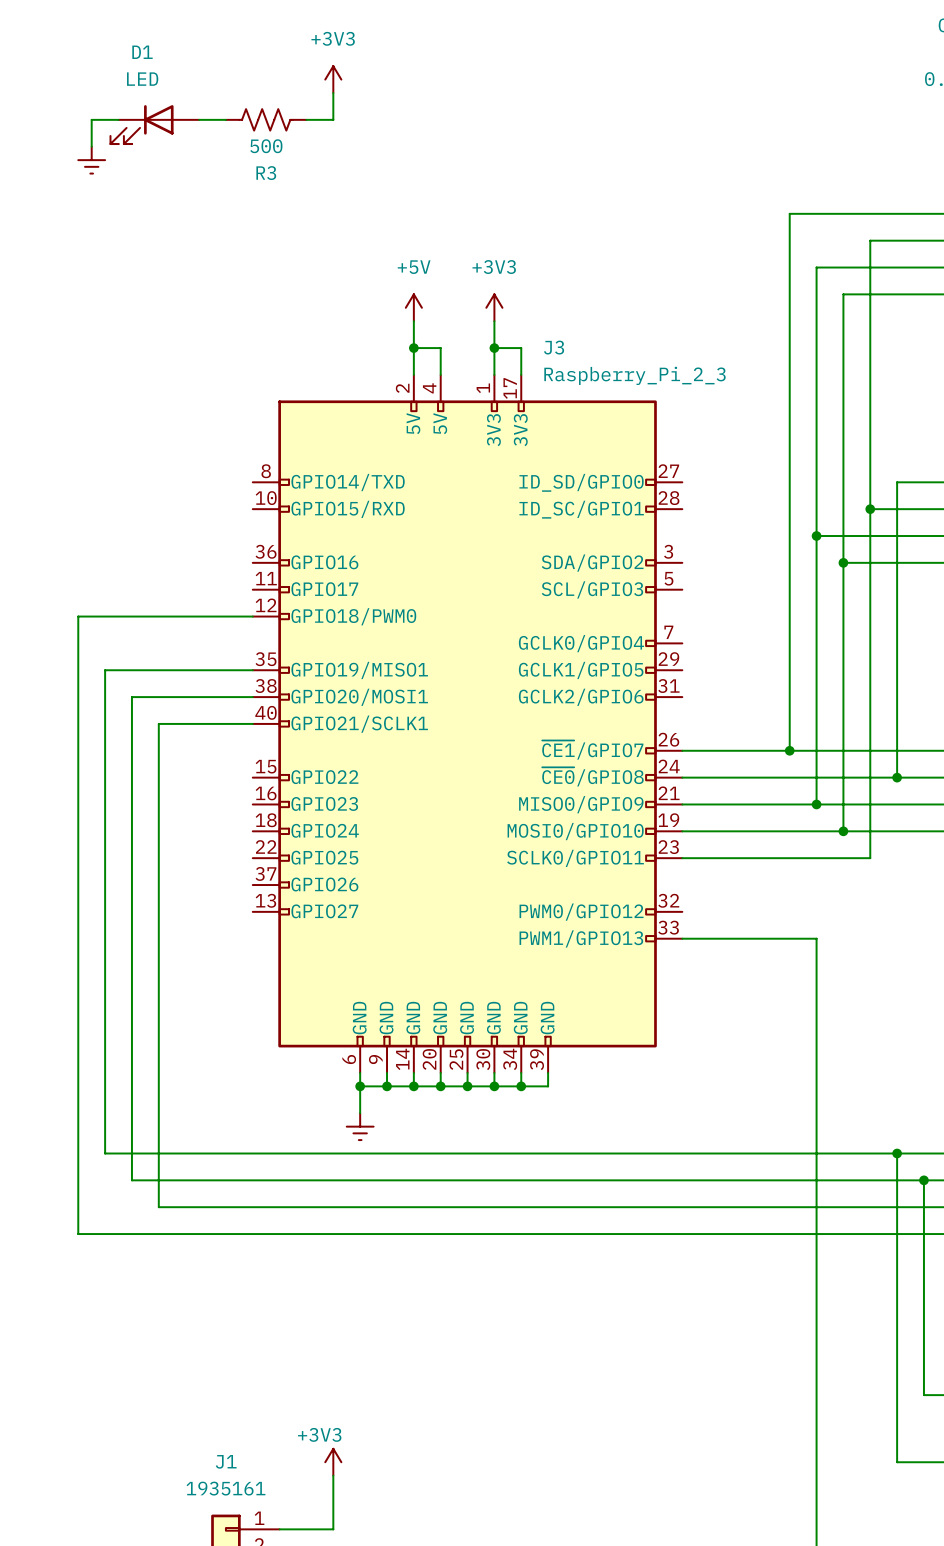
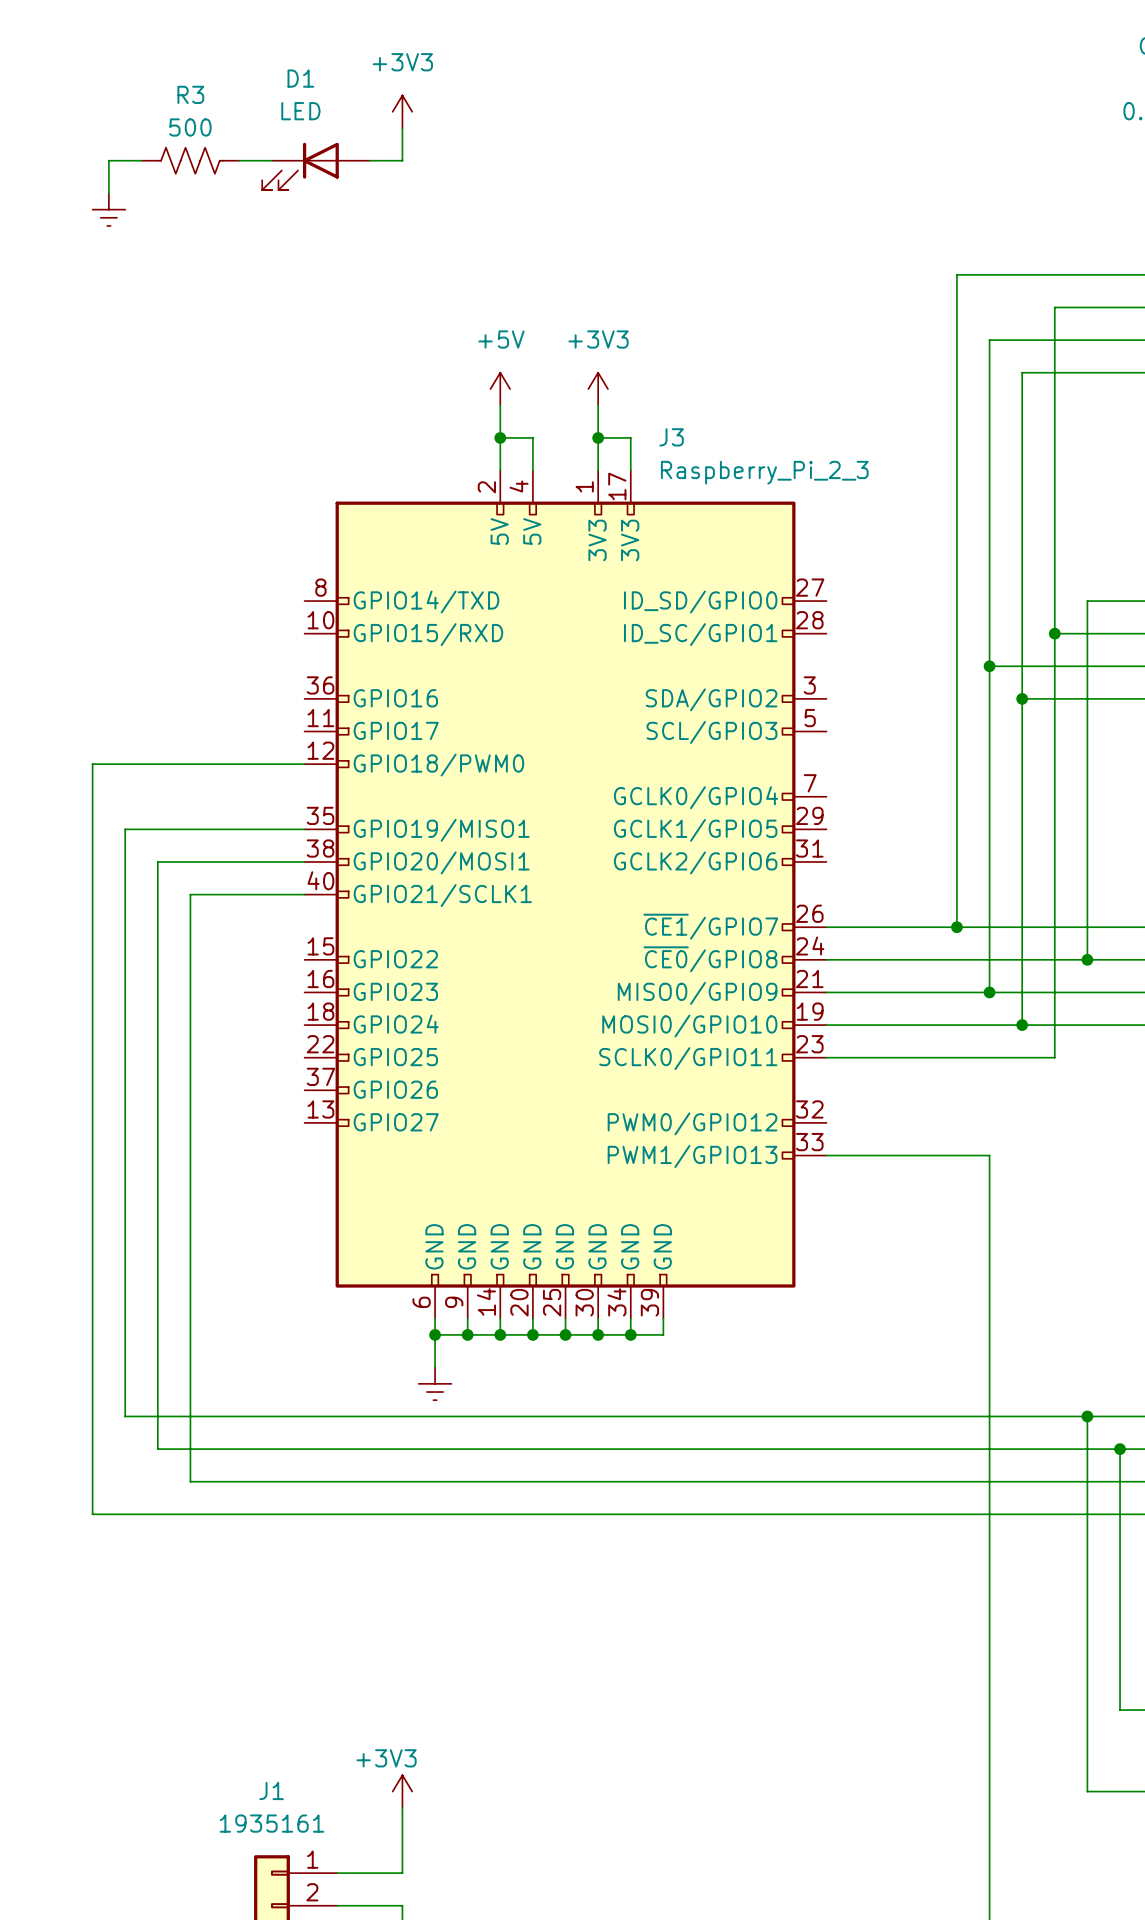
R3 position: (266, 119) -> (190, 160)
D1 position: (154, 124) -> (316, 166)
R3 value position: 500 (266, 146) -> 500 (190, 127)
R3 name position: R3 (266, 173) -> R3 (190, 94)

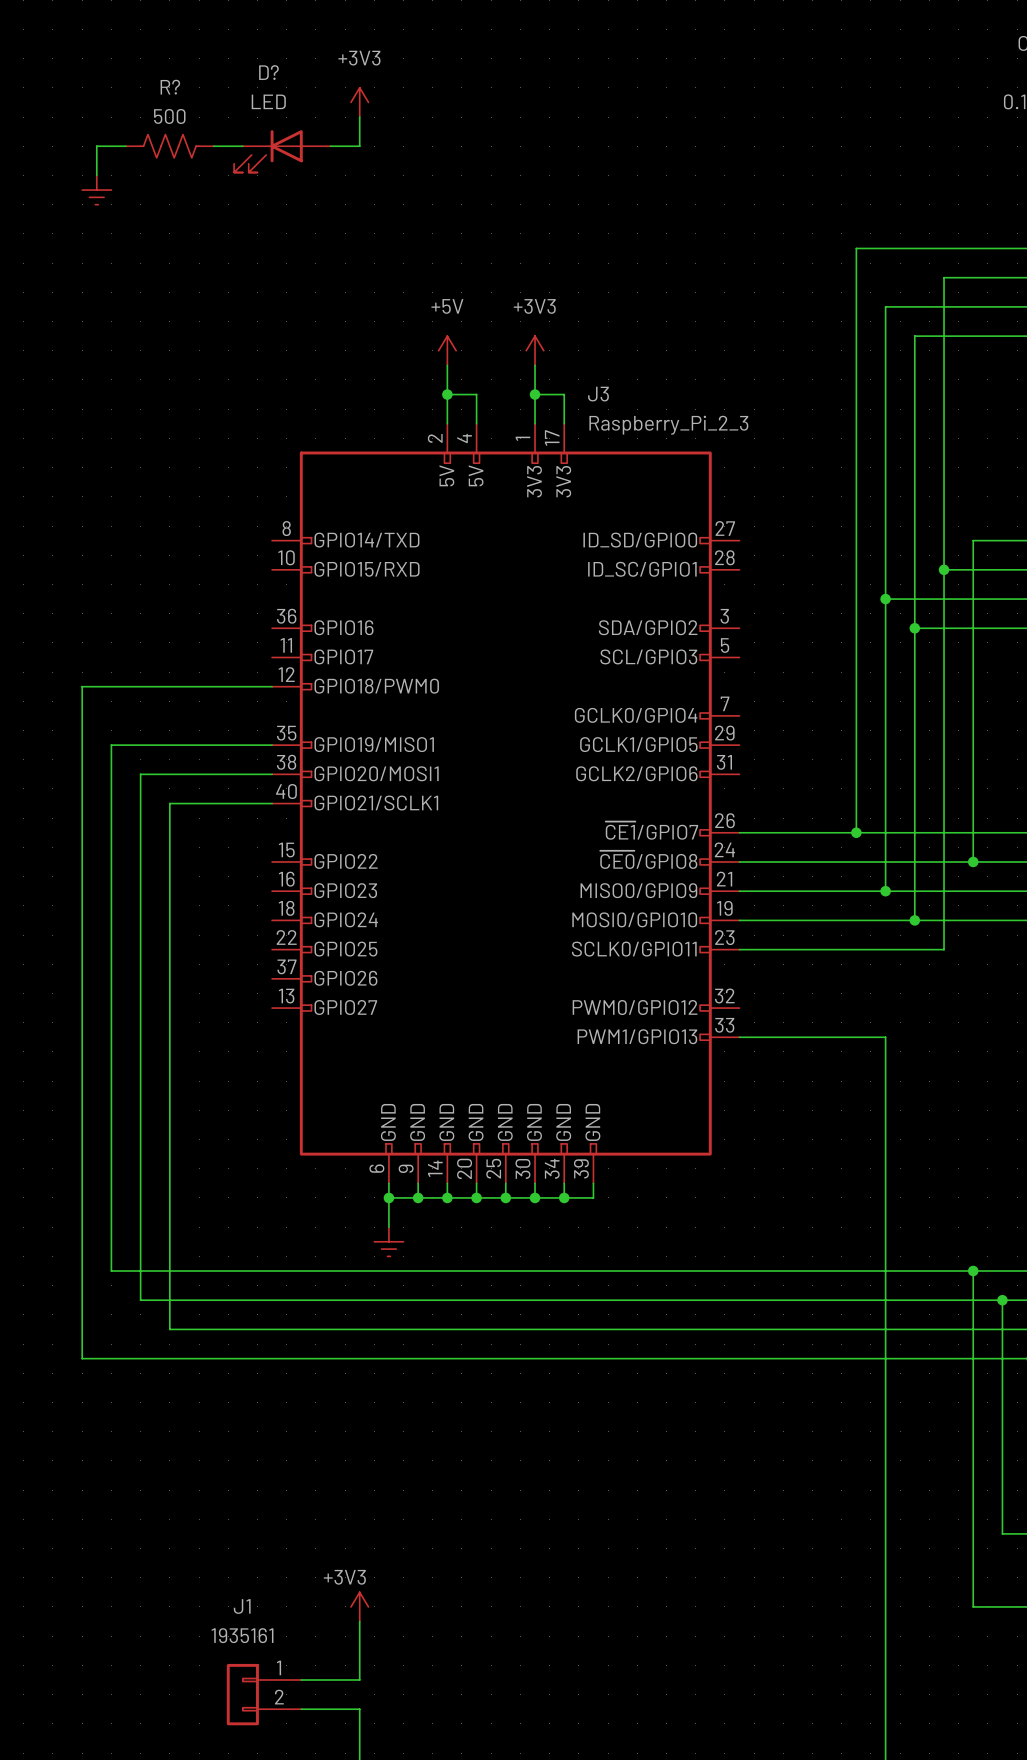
D1 name: D1 (300, 78) -> D? (268, 72)
R3 name: R3 (190, 94) -> R? (170, 87)

